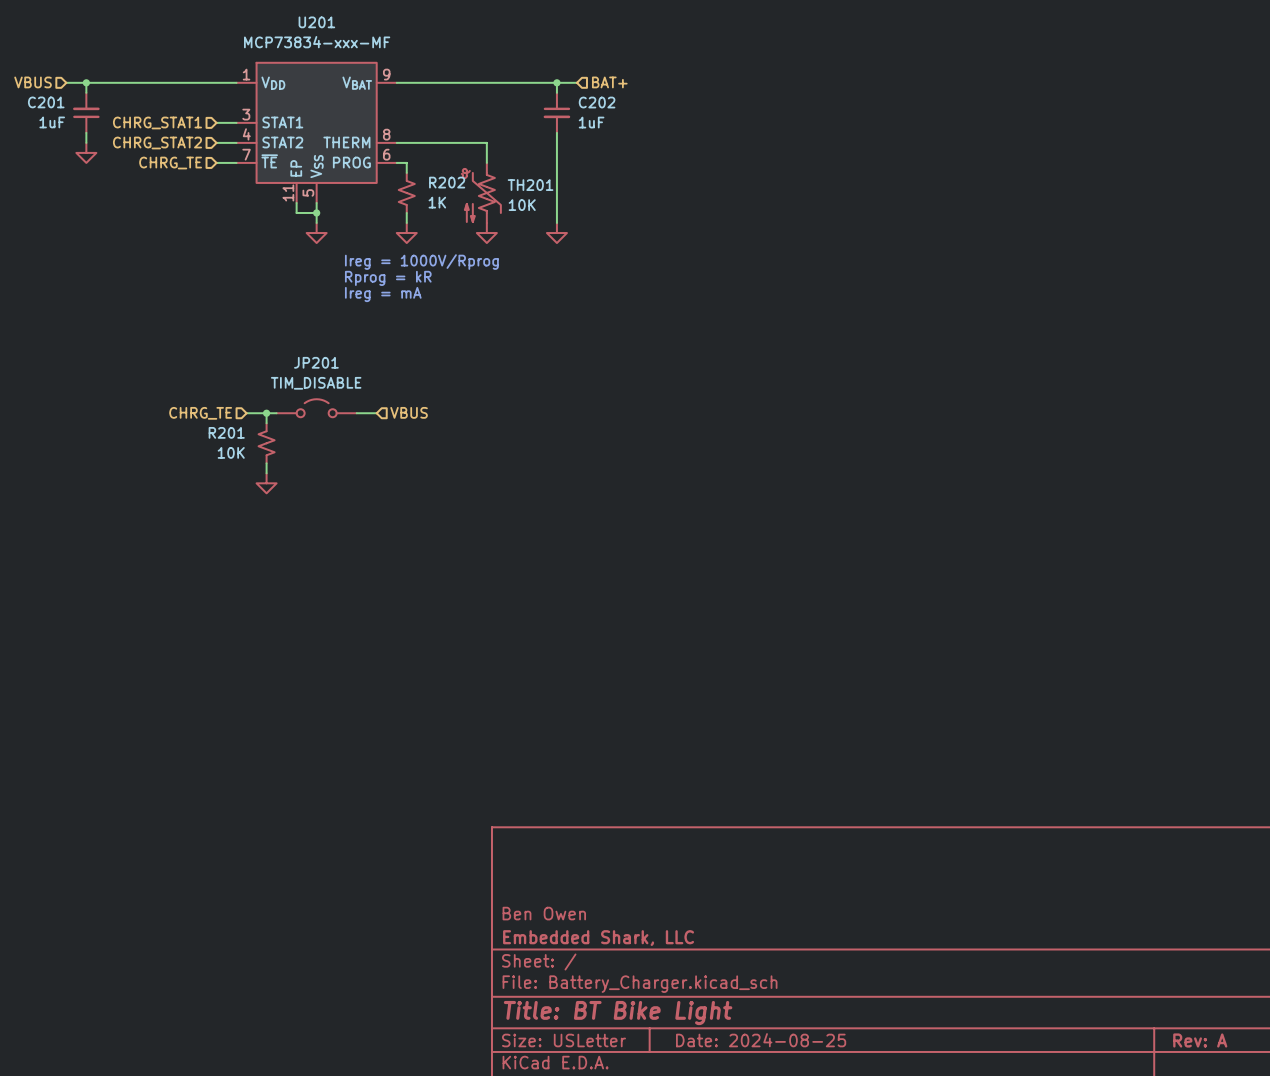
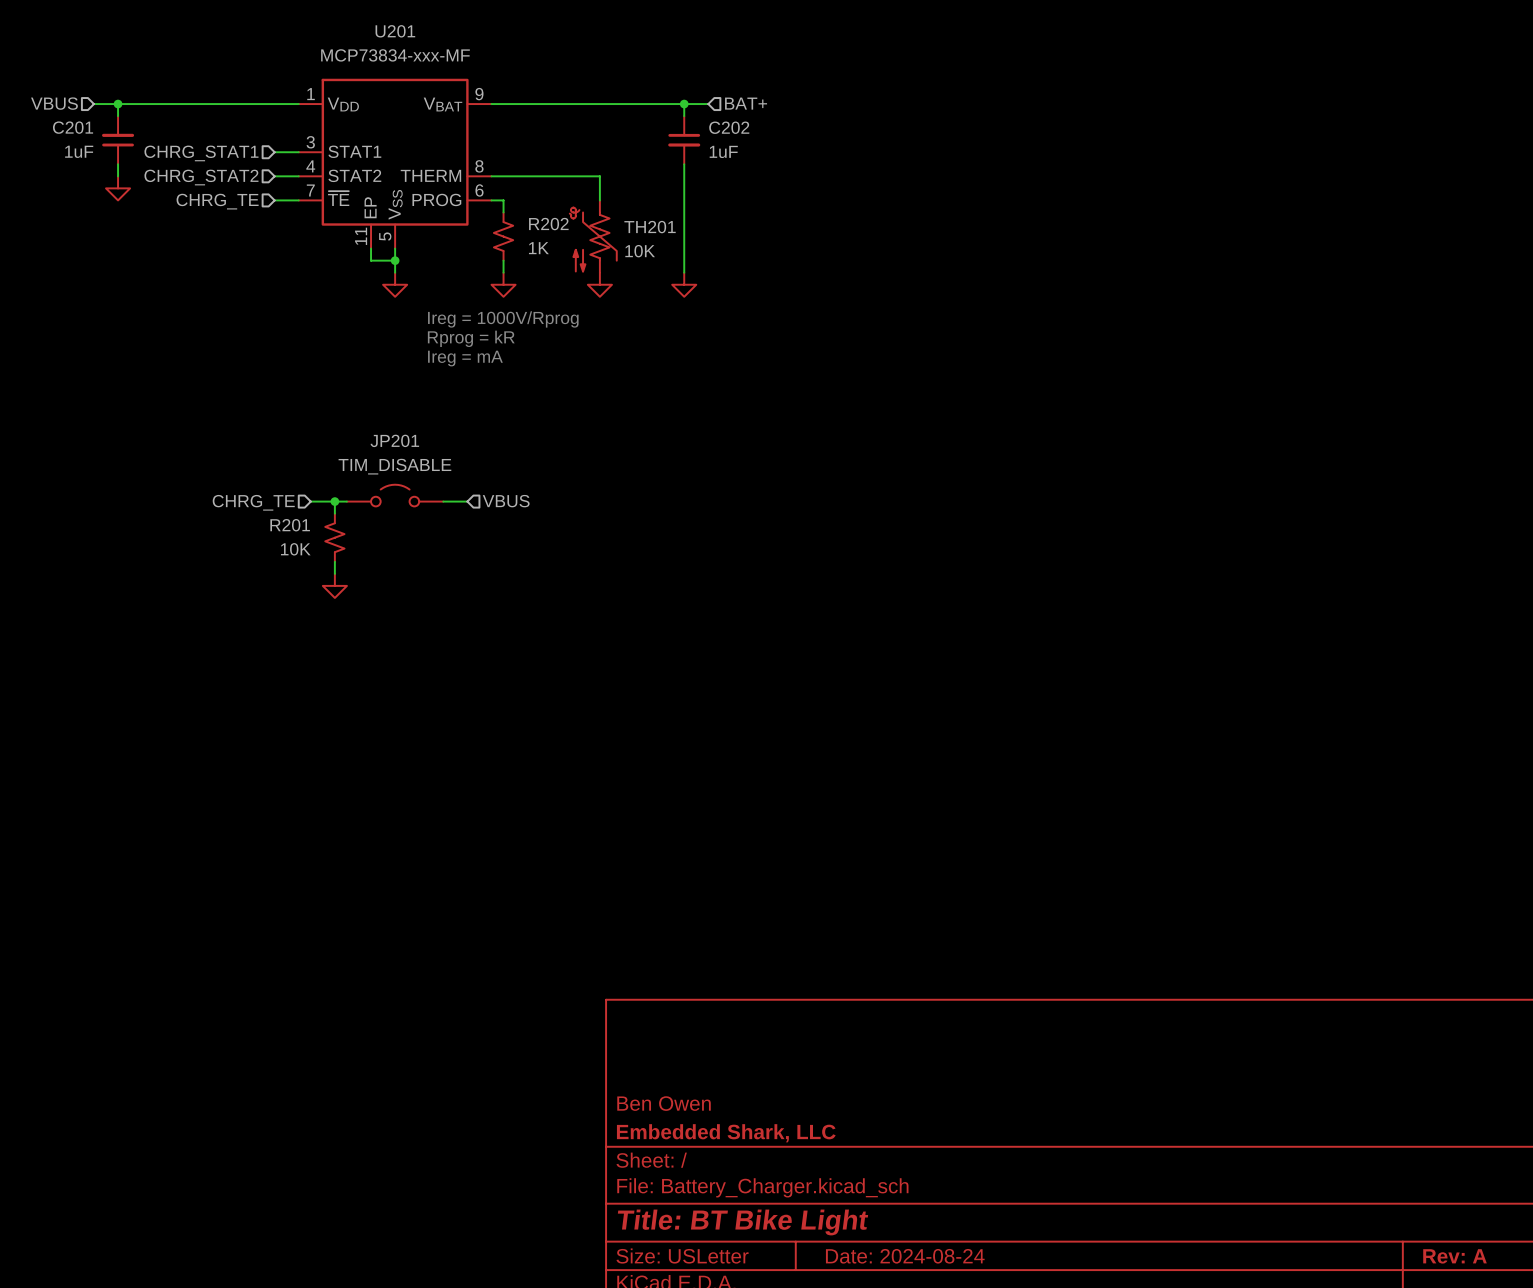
title block: Date: 2024-08-25 (761, 1040) -> Date: 2024-08-24 (905, 1256)

